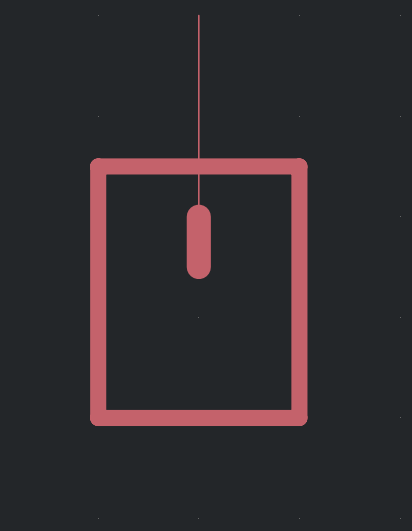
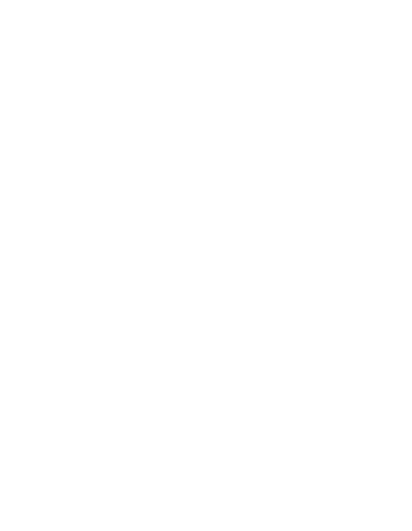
part: (198, 220) -> none

